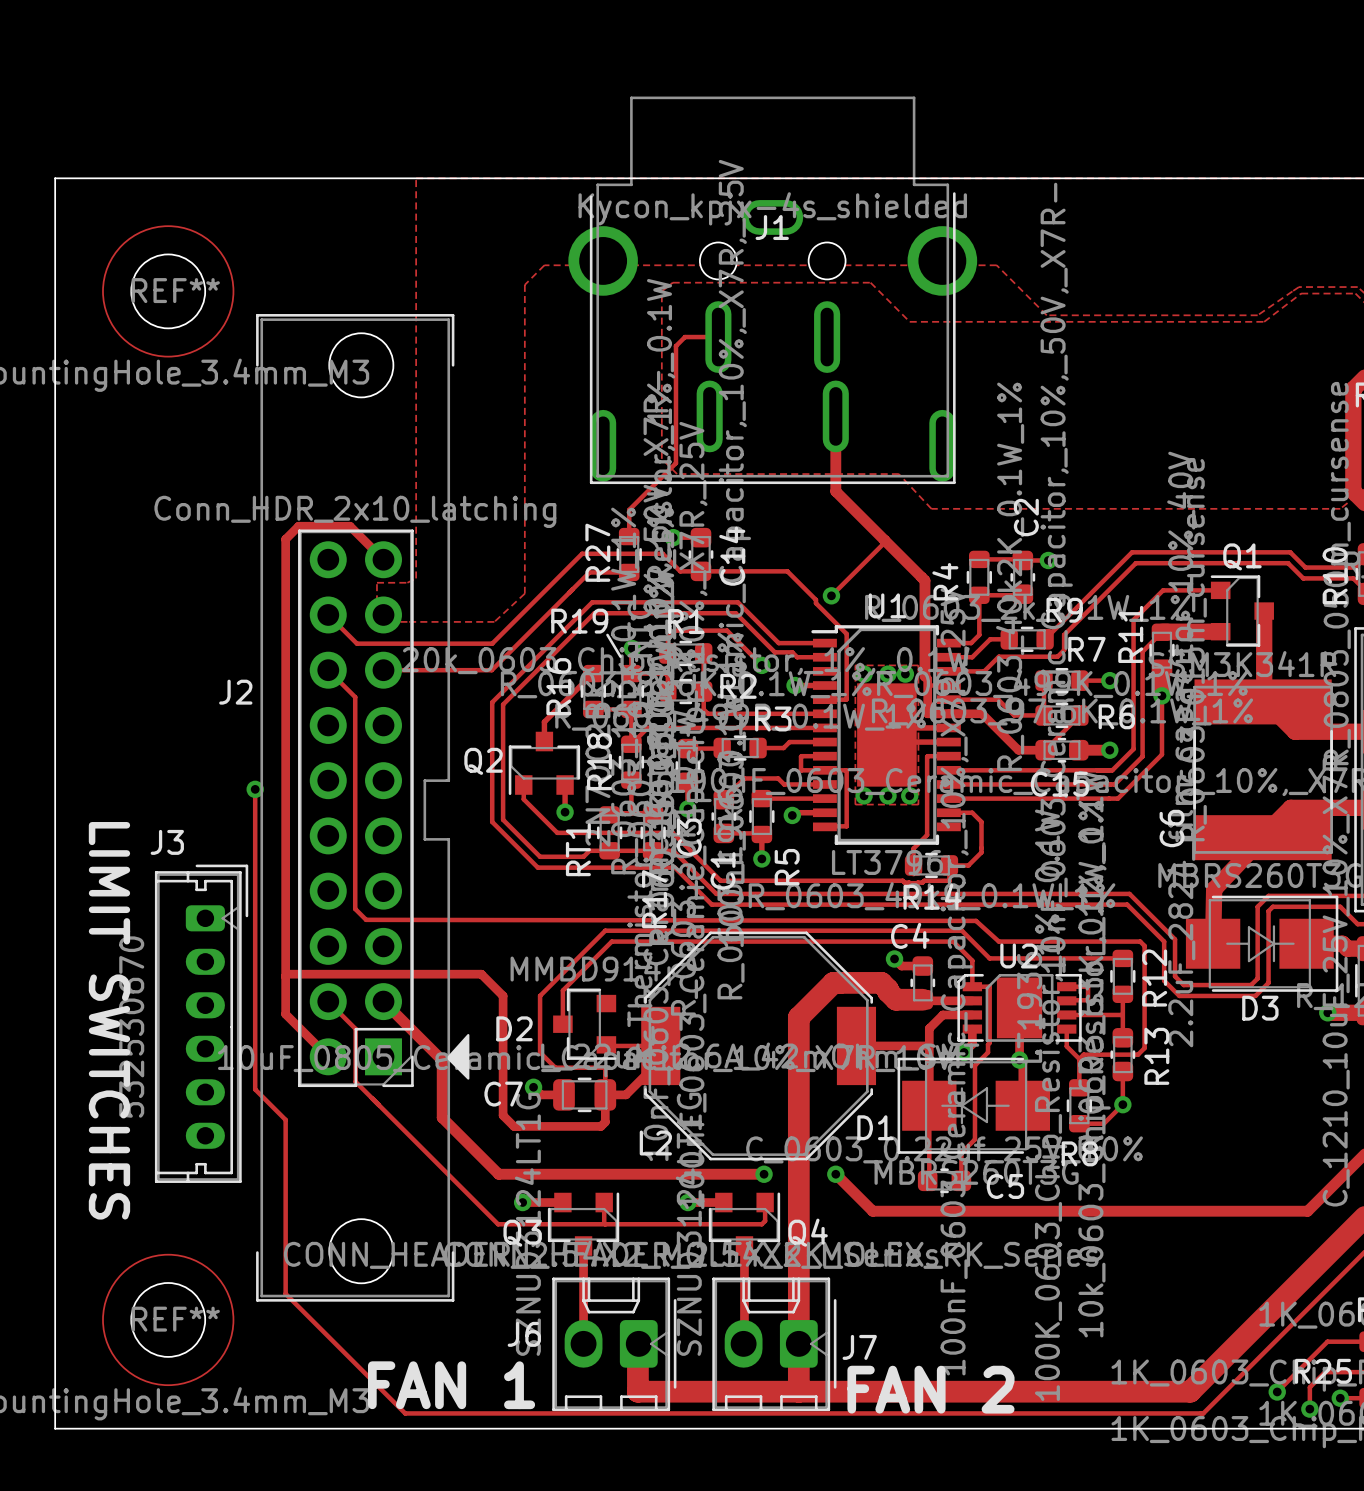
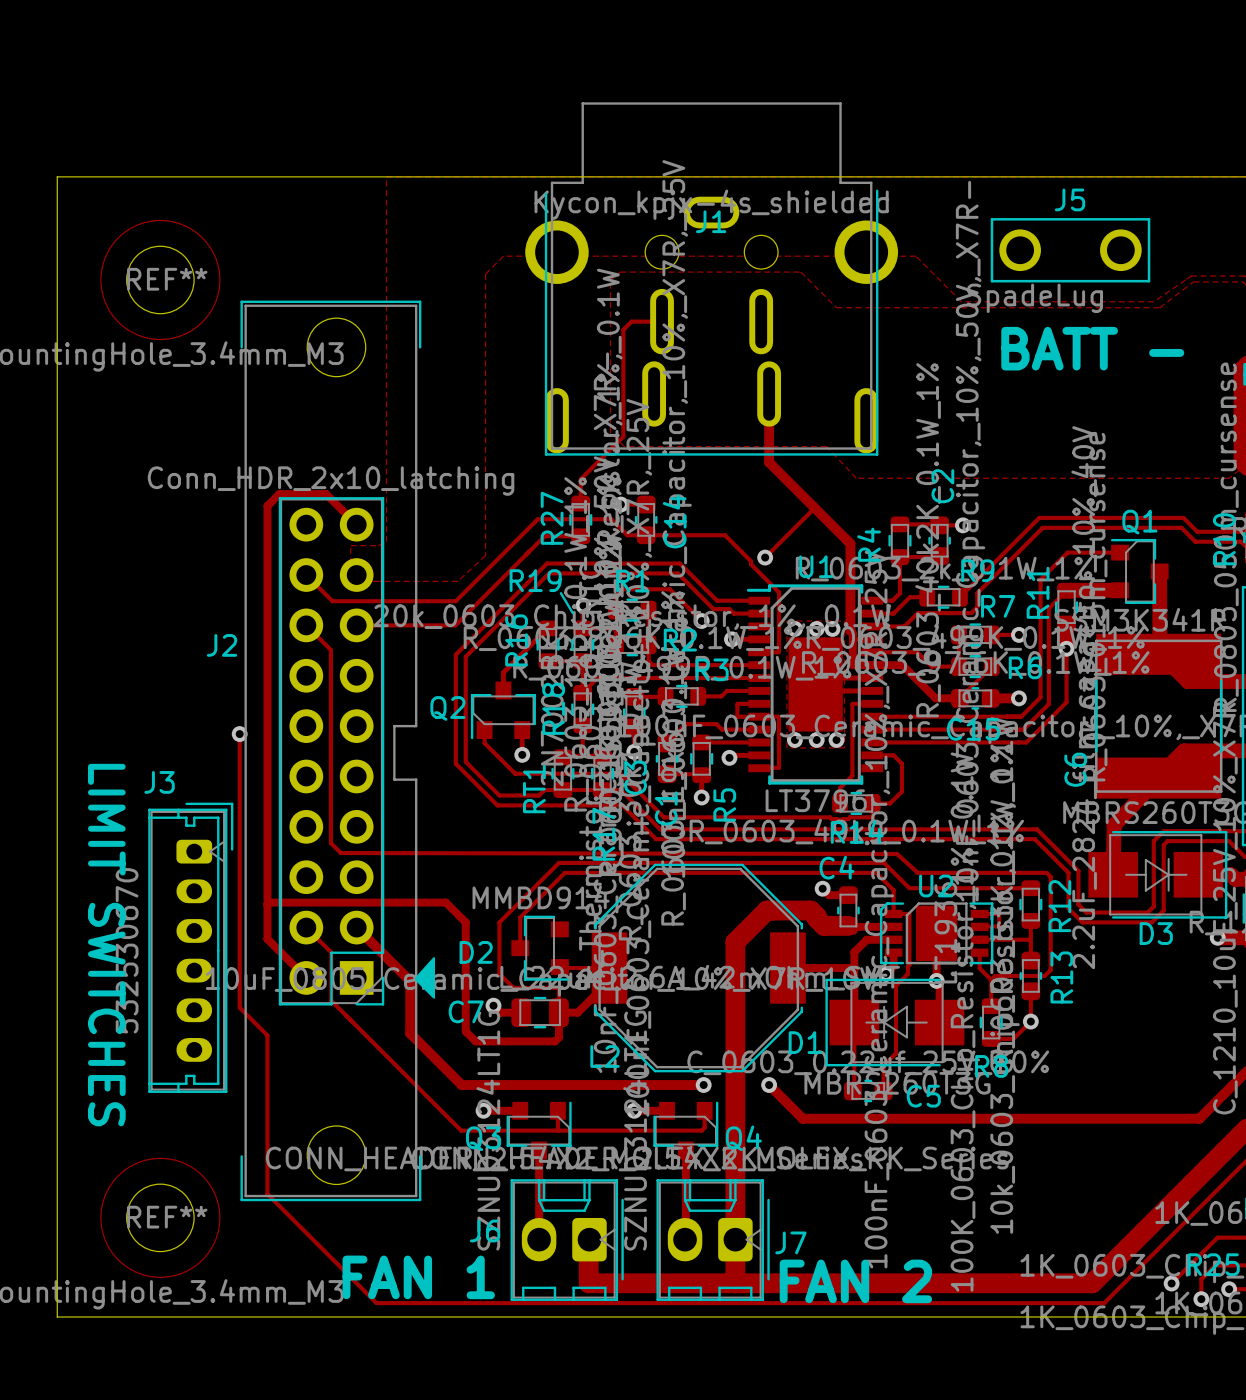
J5: none -> SpadeLug (1070, 250)
text: none -> BATT - (1092, 348)

